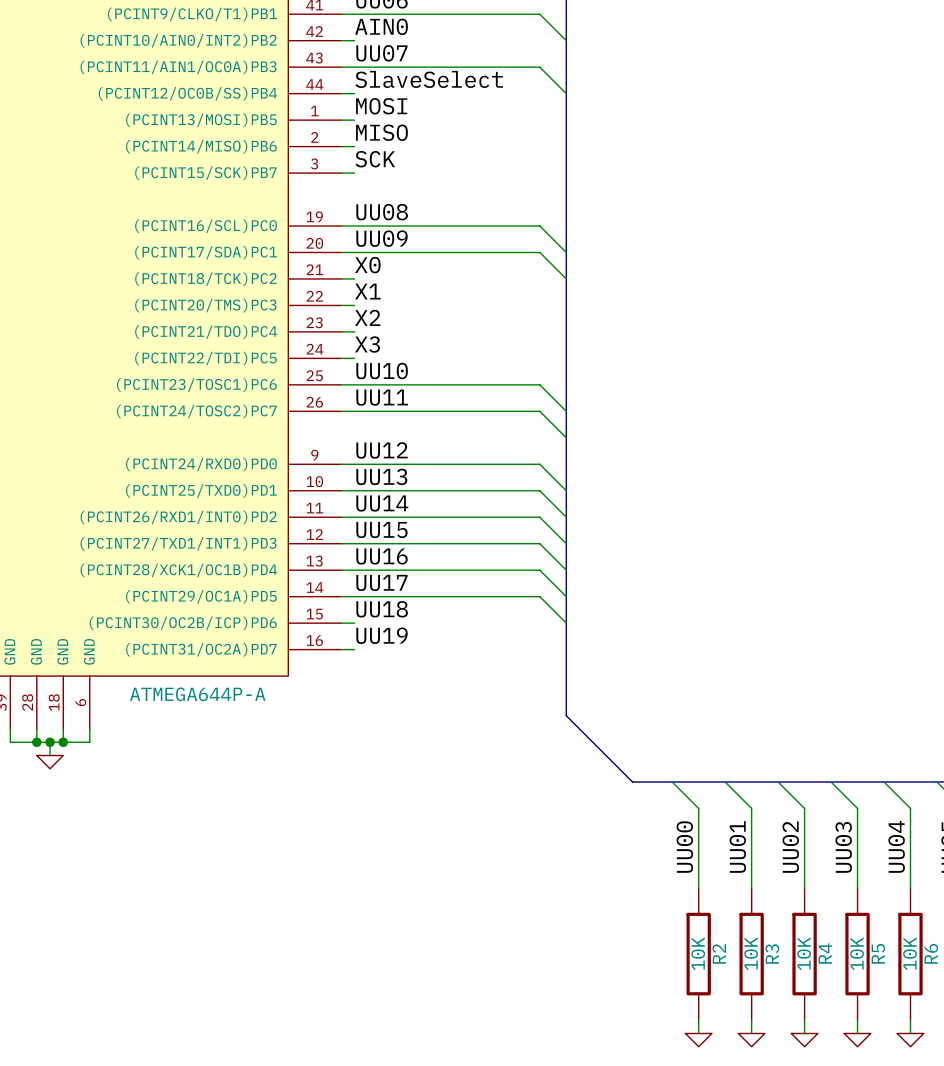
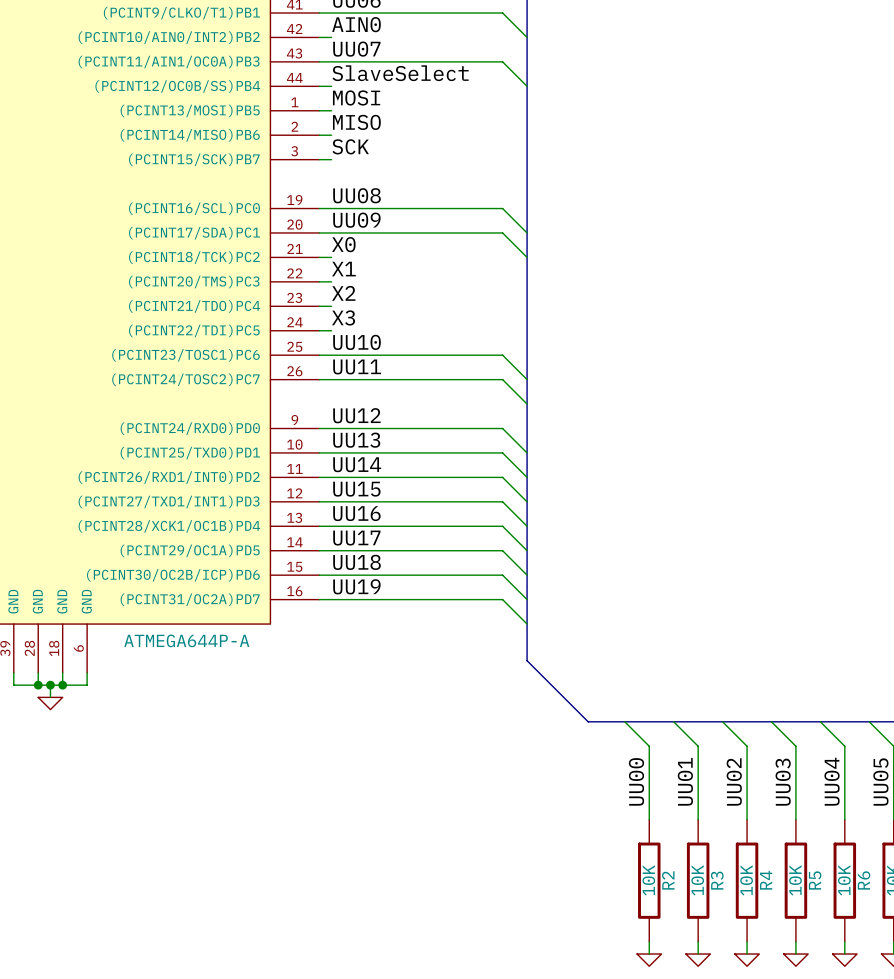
wire: none -> (331, 575) (502, 575) (527, 599)
wire: none -> (331, 599) (502, 599) (527, 624)

